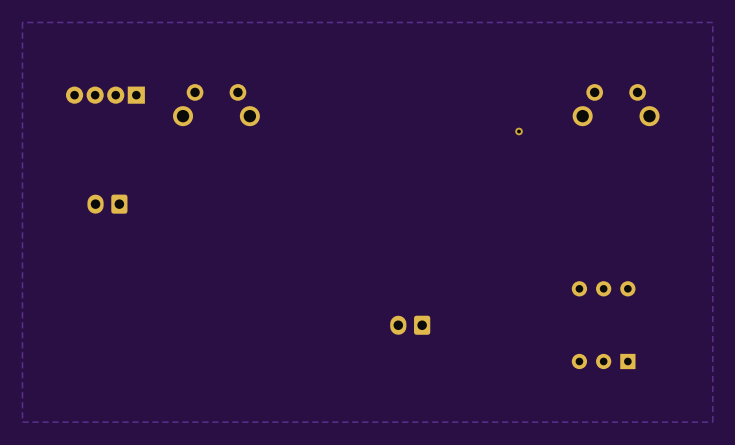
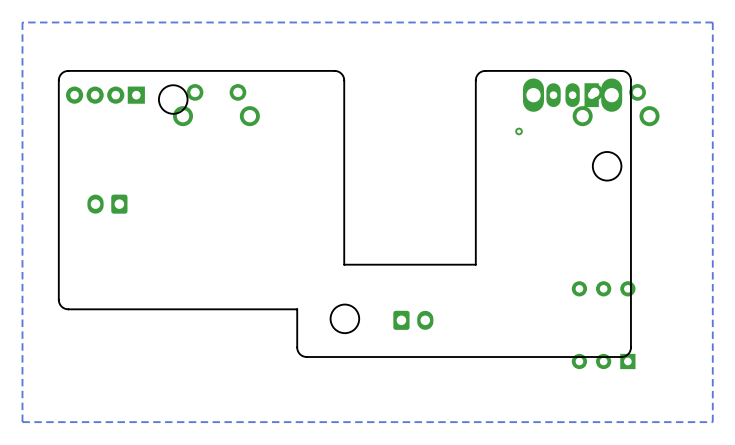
board edge: none -> (621, 70) (485, 70) (477, 74) (475, 80) (475, 264) (344, 264) (344, 80) (338, 71) (65, 71) (60, 74) (58, 80) (59, 302) (62, 307) (68, 309) (297, 309) (297, 349) (300, 354) (305, 356) (624, 356) (629, 352) (630, 347) (630, 80) (628, 73) (621, 70)
round board edge: none -> [158, 84, 189, 115]
part: none -> (572, 95)
round board edge: none -> [592, 151, 622, 182]
round board edge: none -> [330, 304, 360, 334]
part rotation: 0° (410, 325) -> 180° (413, 320)

